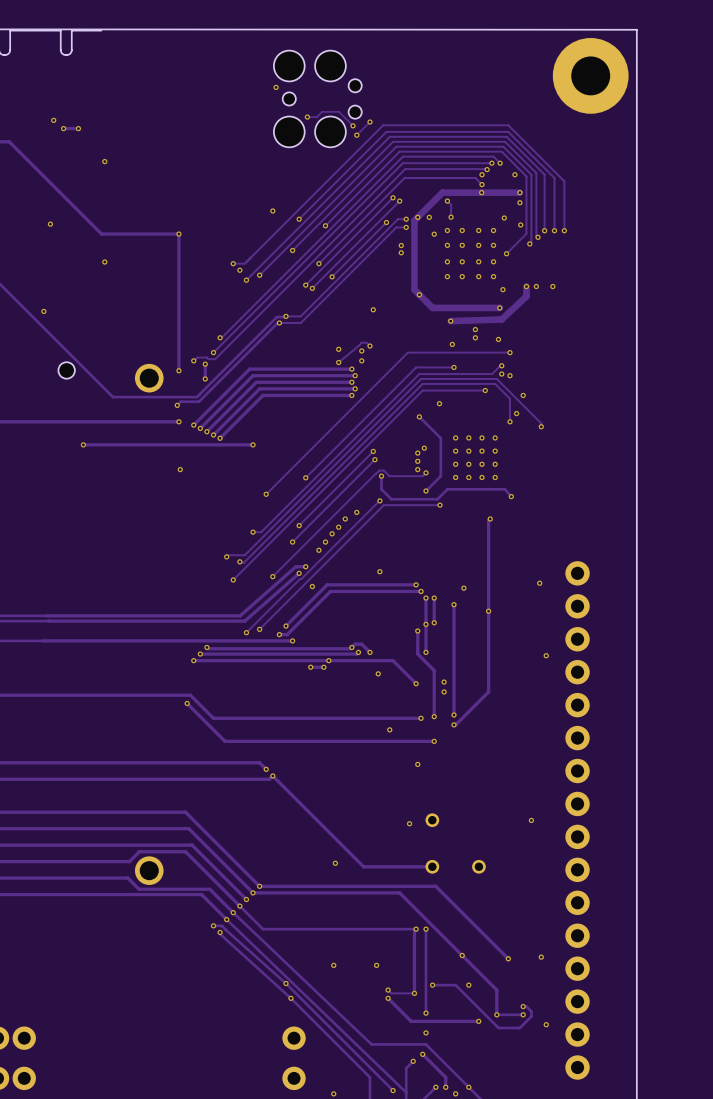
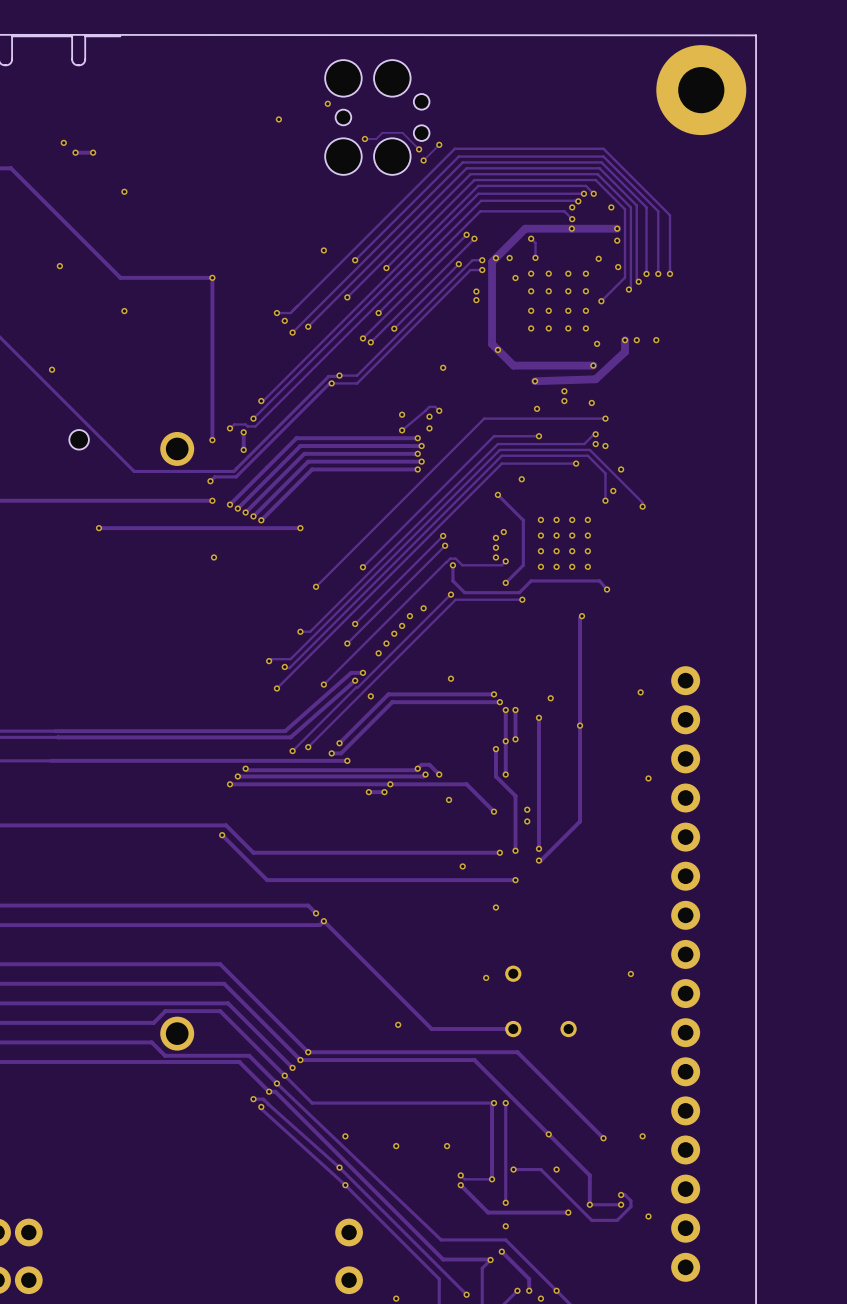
via: none -> (278, 119)
track: (226, 919) (406, 1092) -> (269, 1091) (275, 1091) (443, 1259) (490, 1259)
via: none -> (345, 1136)

